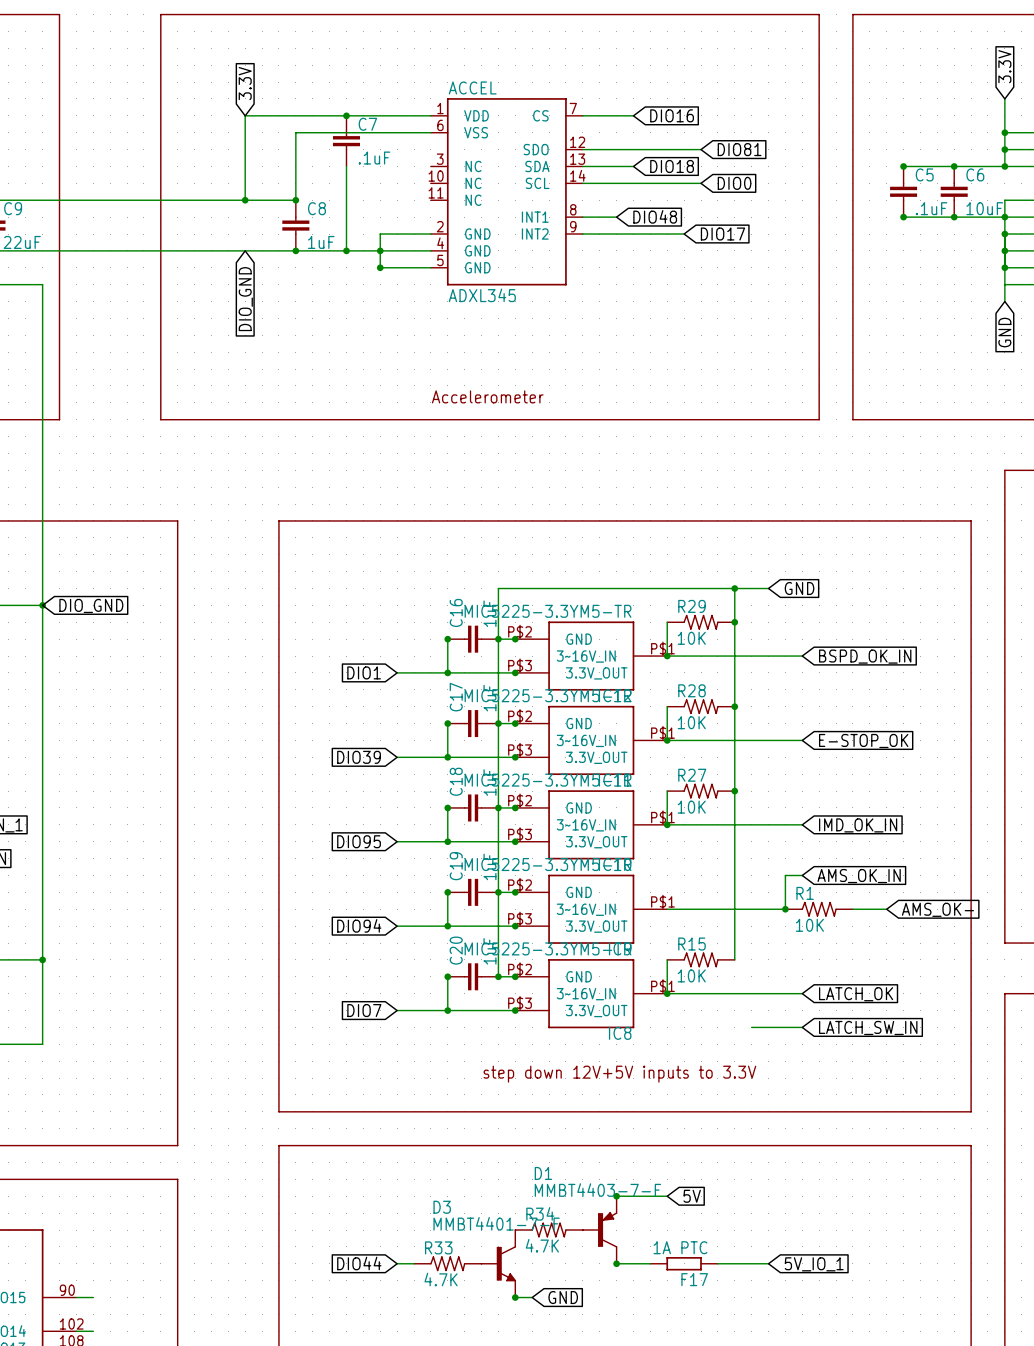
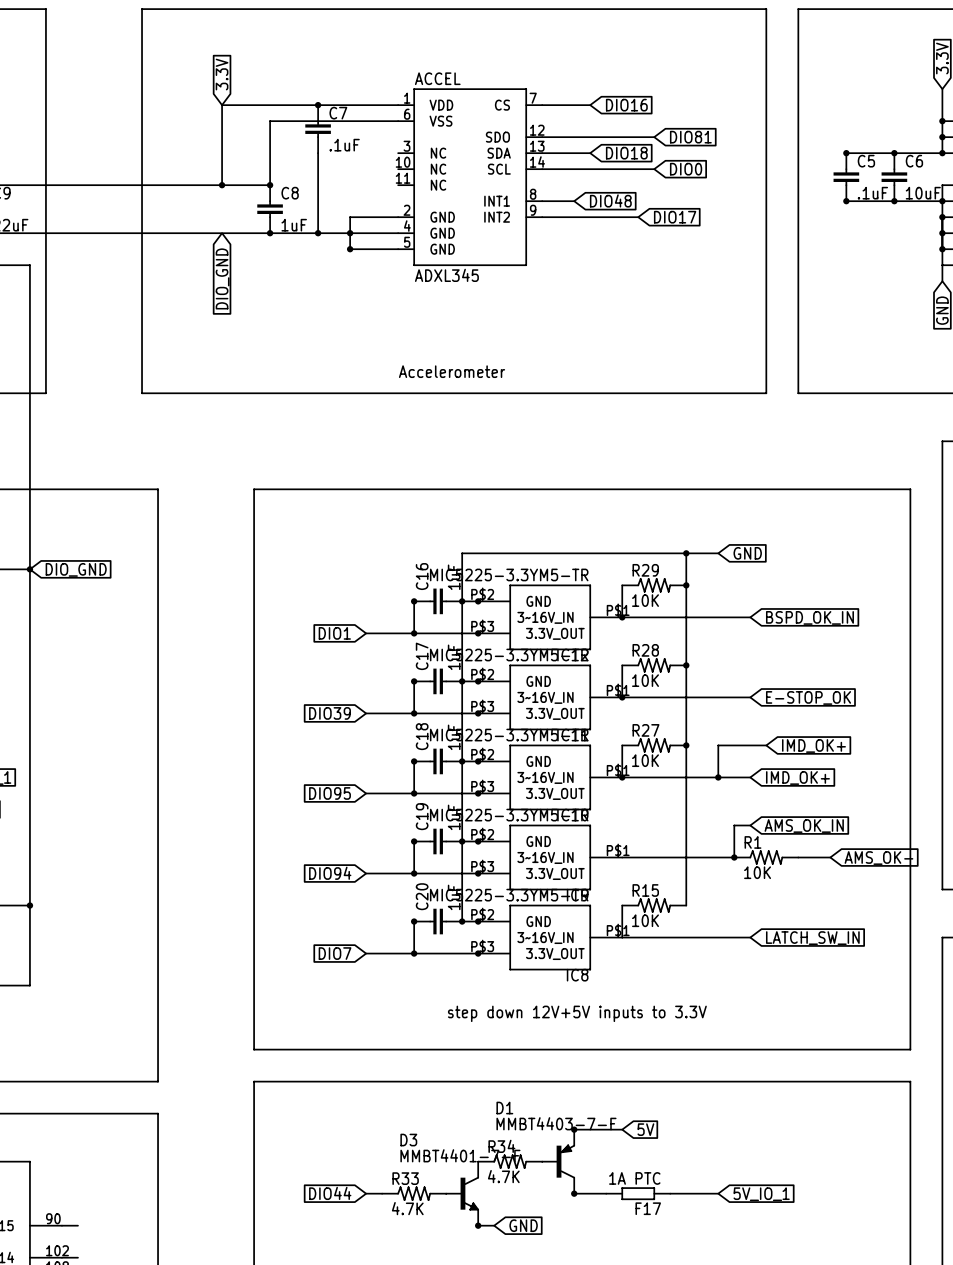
wire: none -> (766, 745) (718, 745) (718, 777)
global label: none -> IMD_OK+ (813, 745)
junction: none -> (718, 777)
global label: IMD_OK_IN (858, 825) -> IMD_OK+ (797, 778)
junction: (667, 993) -> none
global label: LATCH_OK (856, 994) -> LATCH_SW_IN (812, 938)
wire: (751, 1027) (802, 1027) -> none
global label: LATCH_SW_IN (868, 1027) -> none

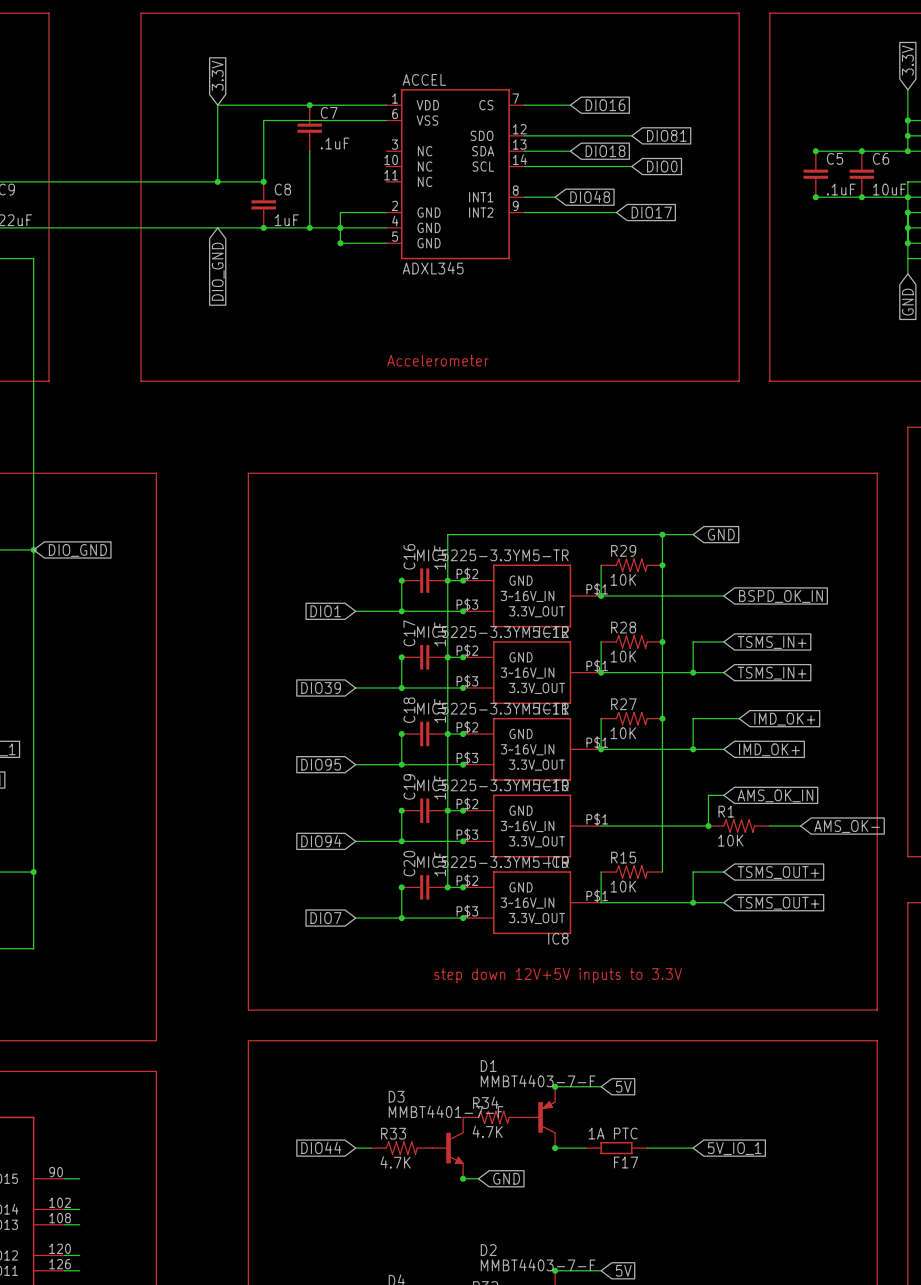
wire: none -> (723, 641) (693, 641) (693, 672)
global label: none -> TSMS_IN+ (772, 642)
junction: none -> (693, 672)
global label: E-STOP_OK (808, 697) -> TSMS_IN+ (772, 673)
wire: none -> (723, 872) (693, 872) (693, 902)
global label: none -> TSMS_OUT+ (778, 872)
junction: none -> (693, 902)
global label: LATCH_SW_IN (812, 938) -> TSMS_OUT+ (778, 903)

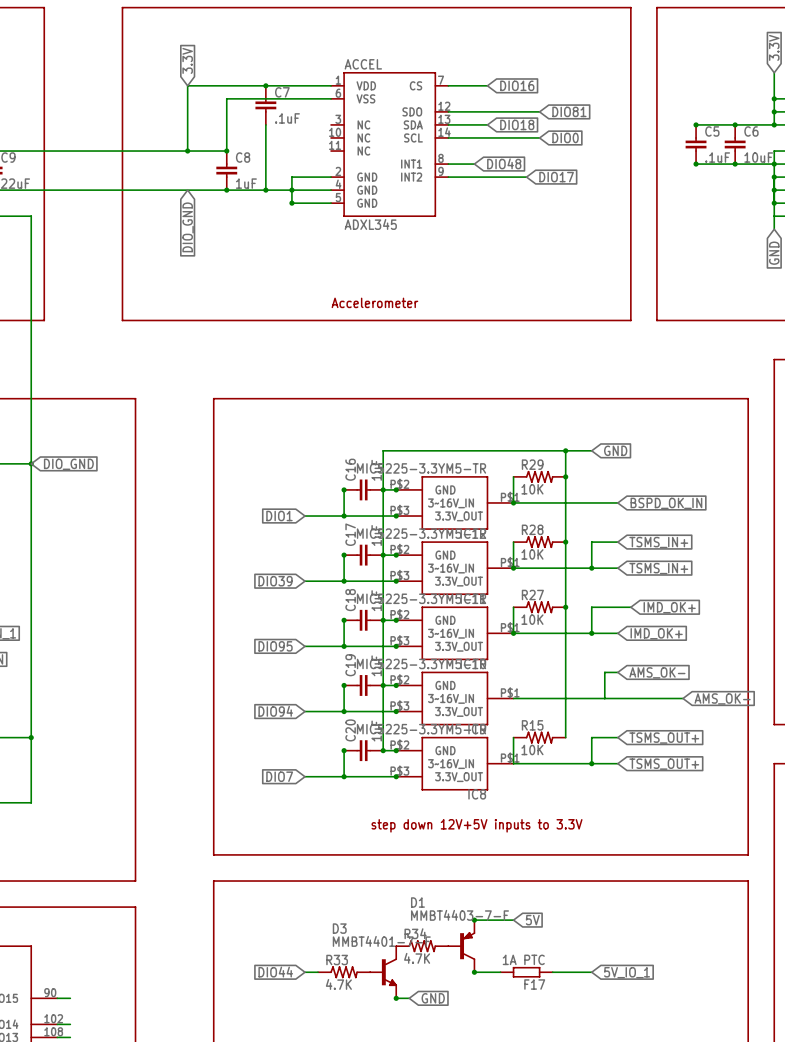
global label: AMS_OK_IN (775, 795) -> AMS_OK- (657, 672)
junction: (708, 826) -> none
R1: 10K (739, 826) -> none

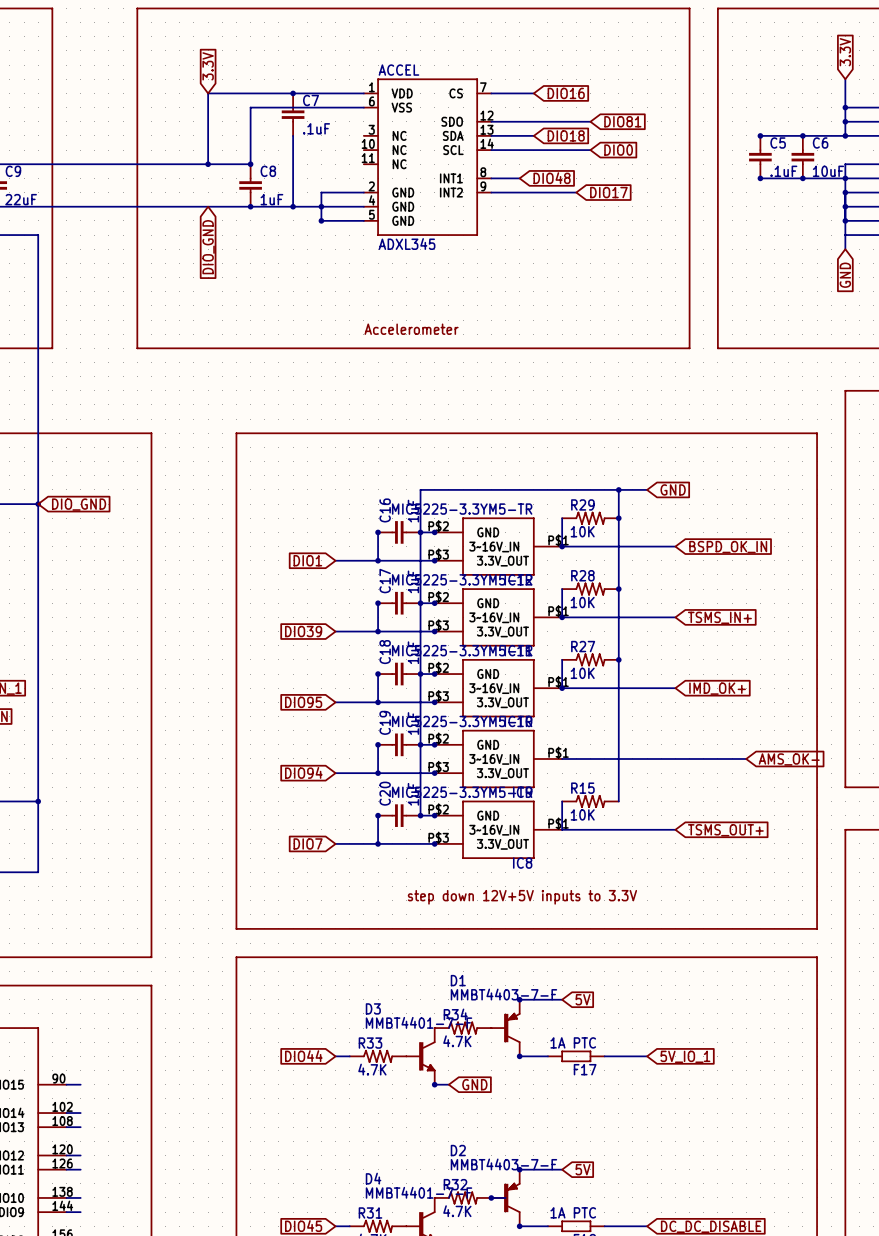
wire: (617, 542) (591, 542) (591, 568) -> none
global label: TSMS_IN+ (658, 542) -> none
junction: (591, 568) -> none
wire: (630, 607) (591, 607) (591, 633) -> none
global label: IMD_OK+ (669, 607) -> none
junction: (591, 633) -> none
wire: (617, 672) (604, 672) (604, 698) -> none
global label: AMS_OK- (657, 672) -> none
wire: (617, 737) (591, 737) (591, 763) -> none
global label: TSMS_OUT+ (664, 738) -> none
junction: (591, 763) -> none

